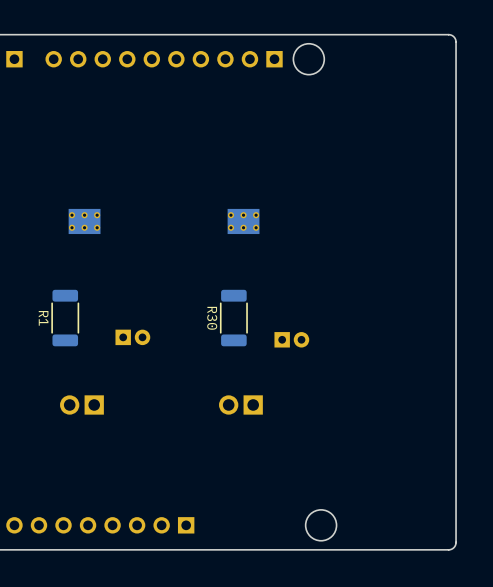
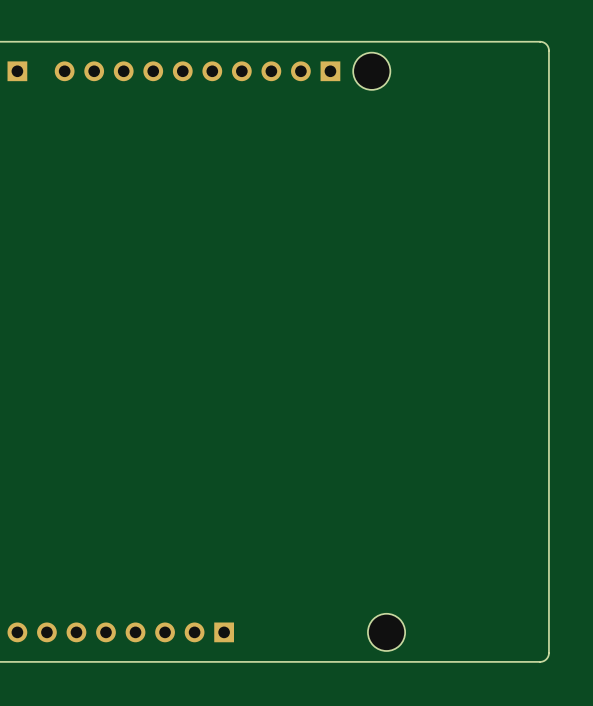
part: (84, 221) -> none
part: (243, 221) -> none
R1: (65, 318) -> none
R30: (233, 318) -> none
part: (132, 337) -> none
part: (291, 339) -> none
part: (81, 404) -> none
part: (240, 404) -> none

